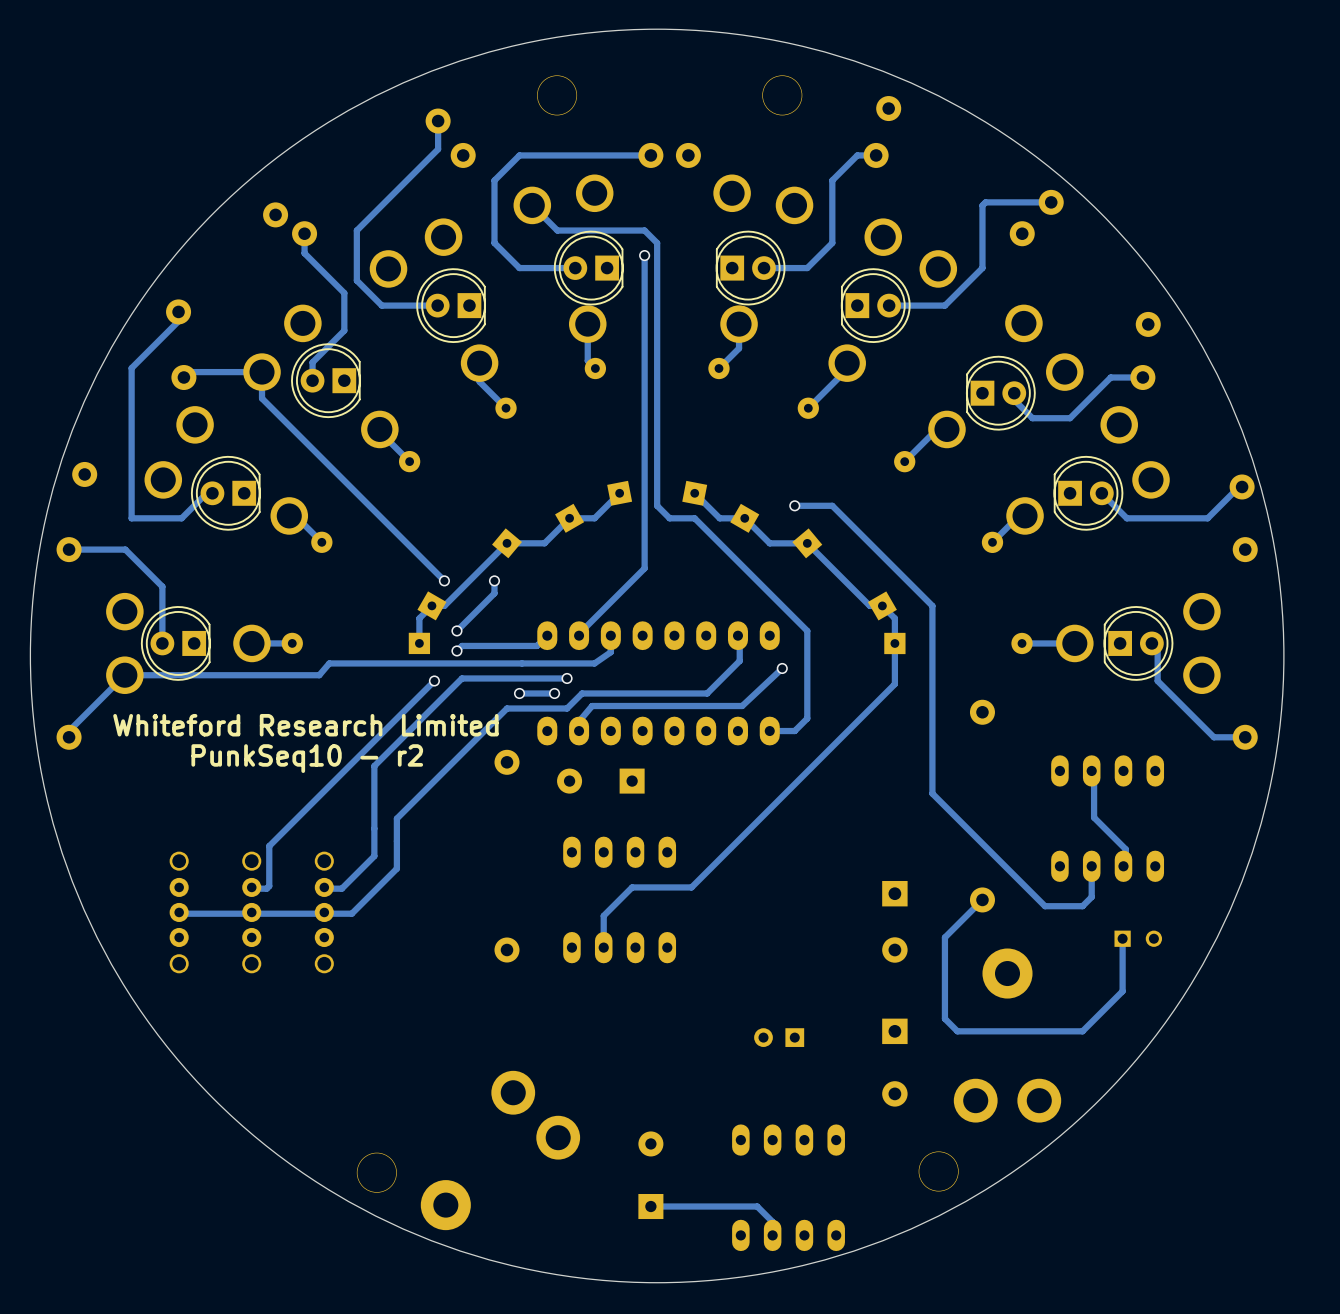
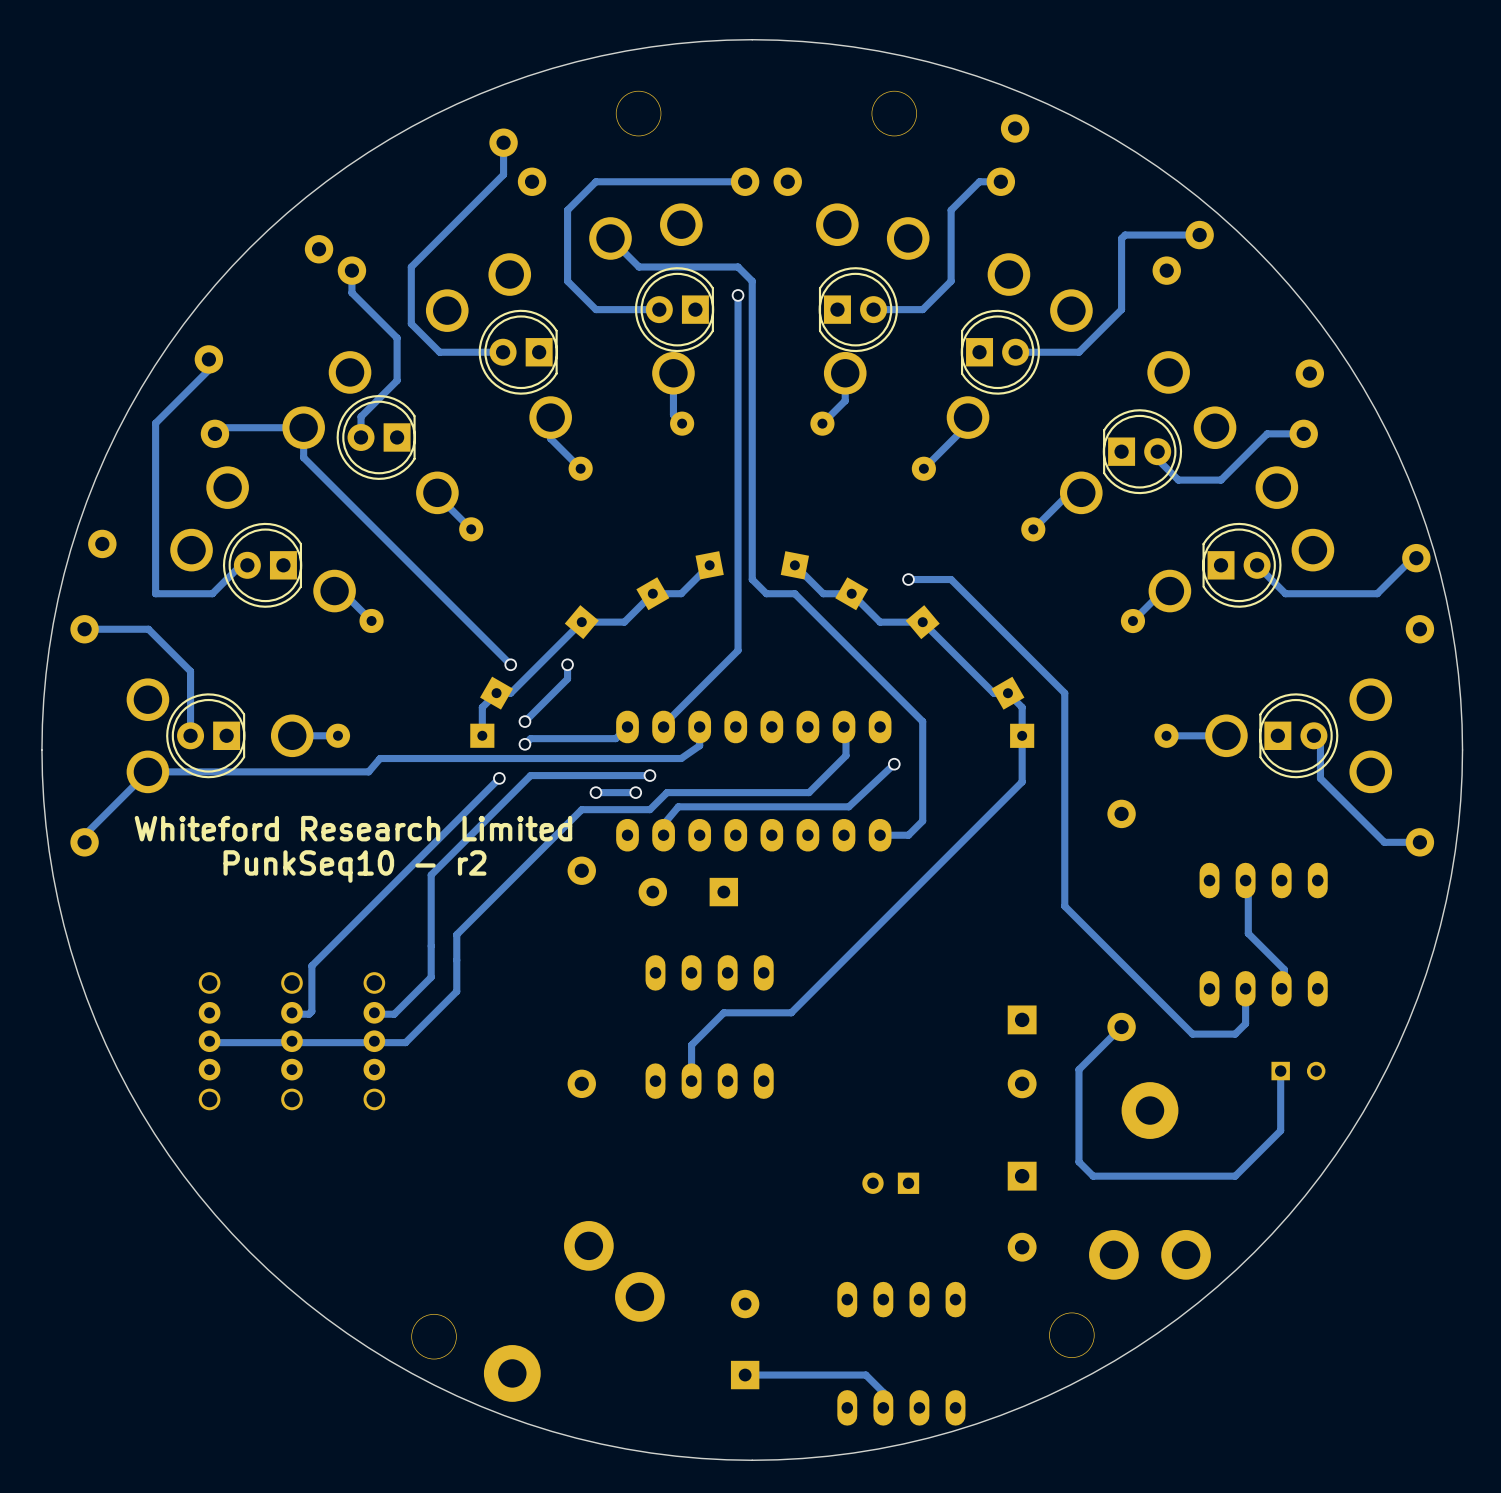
round board edge: [29, 28, 1285, 1284] -> none
board edge: none -> (752, 39) (676, 43) (626, 51) (552, 68) (480, 93) (411, 126) (347, 166) (287, 213) (249, 247) (199, 304) (154, 365) (128, 409) (96, 478) (70, 549) (53, 623) (46, 674) (41, 750) (46, 825) (53, 876) (70, 950) (96, 1021) (128, 1090) (154, 1134) (199, 1195) (249, 1252) (306, 1303) (347, 1333) (411, 1373) (480, 1406) (552, 1431) (626, 1448) (676, 1456) (752, 1460) (828, 1456) (878, 1448) (952, 1431) (1024, 1406) (1092, 1373) (1157, 1333) (1217, 1286) (1254, 1252) (1305, 1195) (1349, 1134) (1375, 1090) (1408, 1021) (1433, 950) (1451, 876) (1458, 825) (1462, 750) (1458, 674) (1451, 623) (1433, 549) (1408, 478) (1375, 409) (1349, 365) (1305, 304) (1254, 247) (1197, 196) (1157, 166) (1092, 126) (1024, 93) (952, 68) (878, 51) (828, 43) (752, 39)

